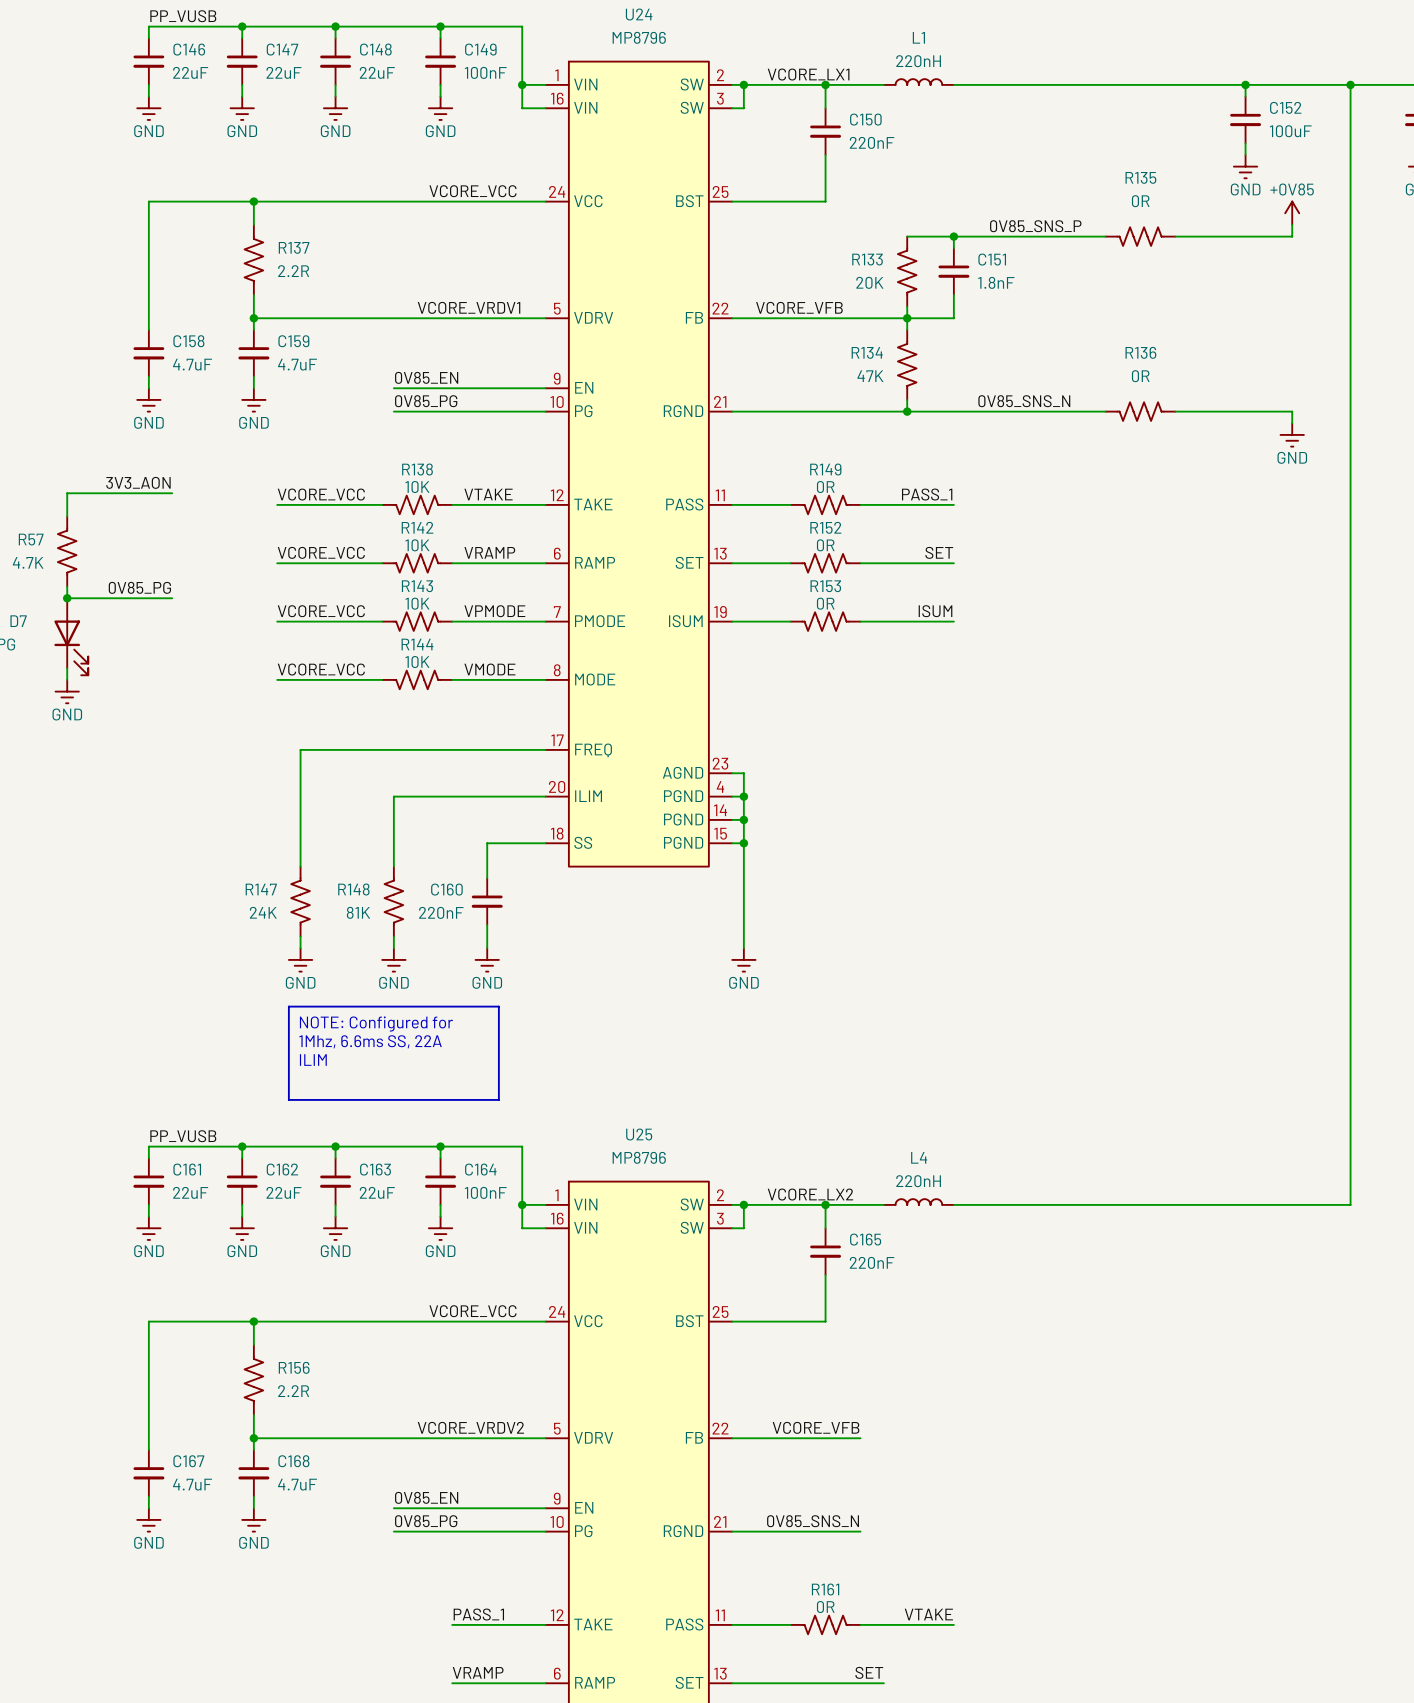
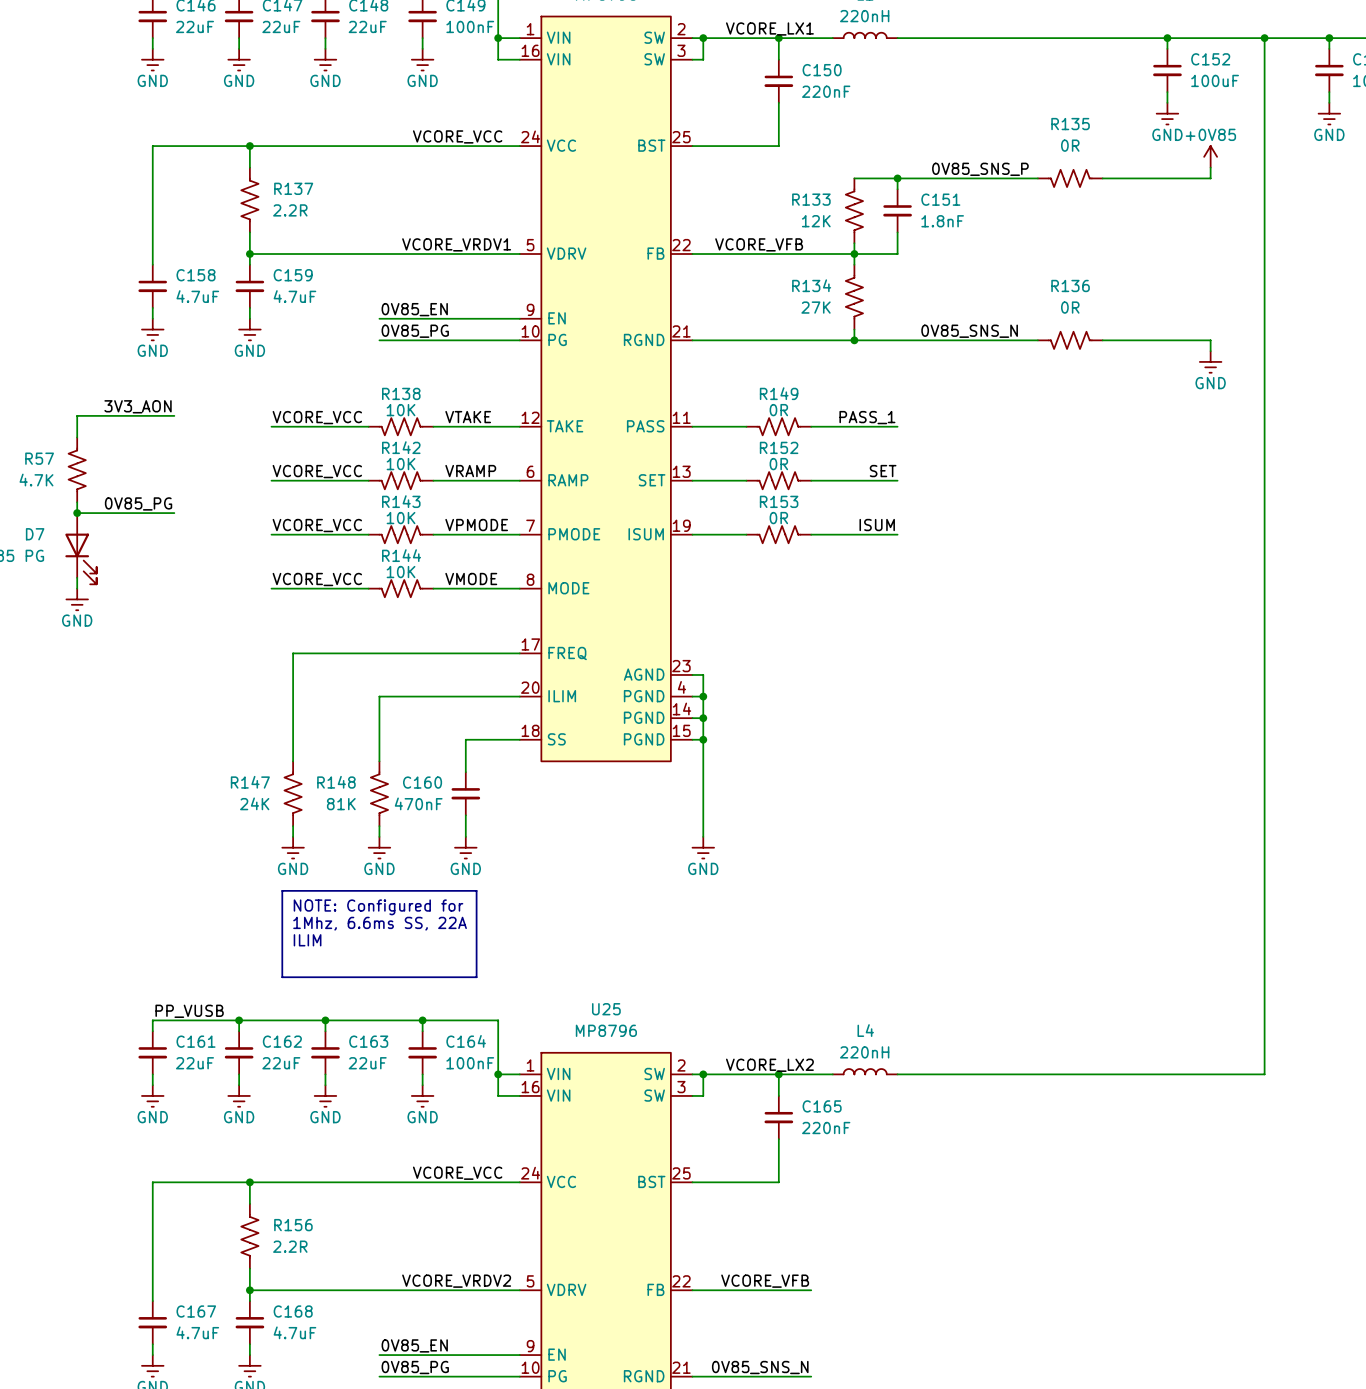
R133 value: 20K (869, 282) -> 12K (816, 221)
R134 value: 47K (870, 376) -> 27K (816, 307)
C160 value: 220nF (441, 912) -> 470nF (418, 803)

